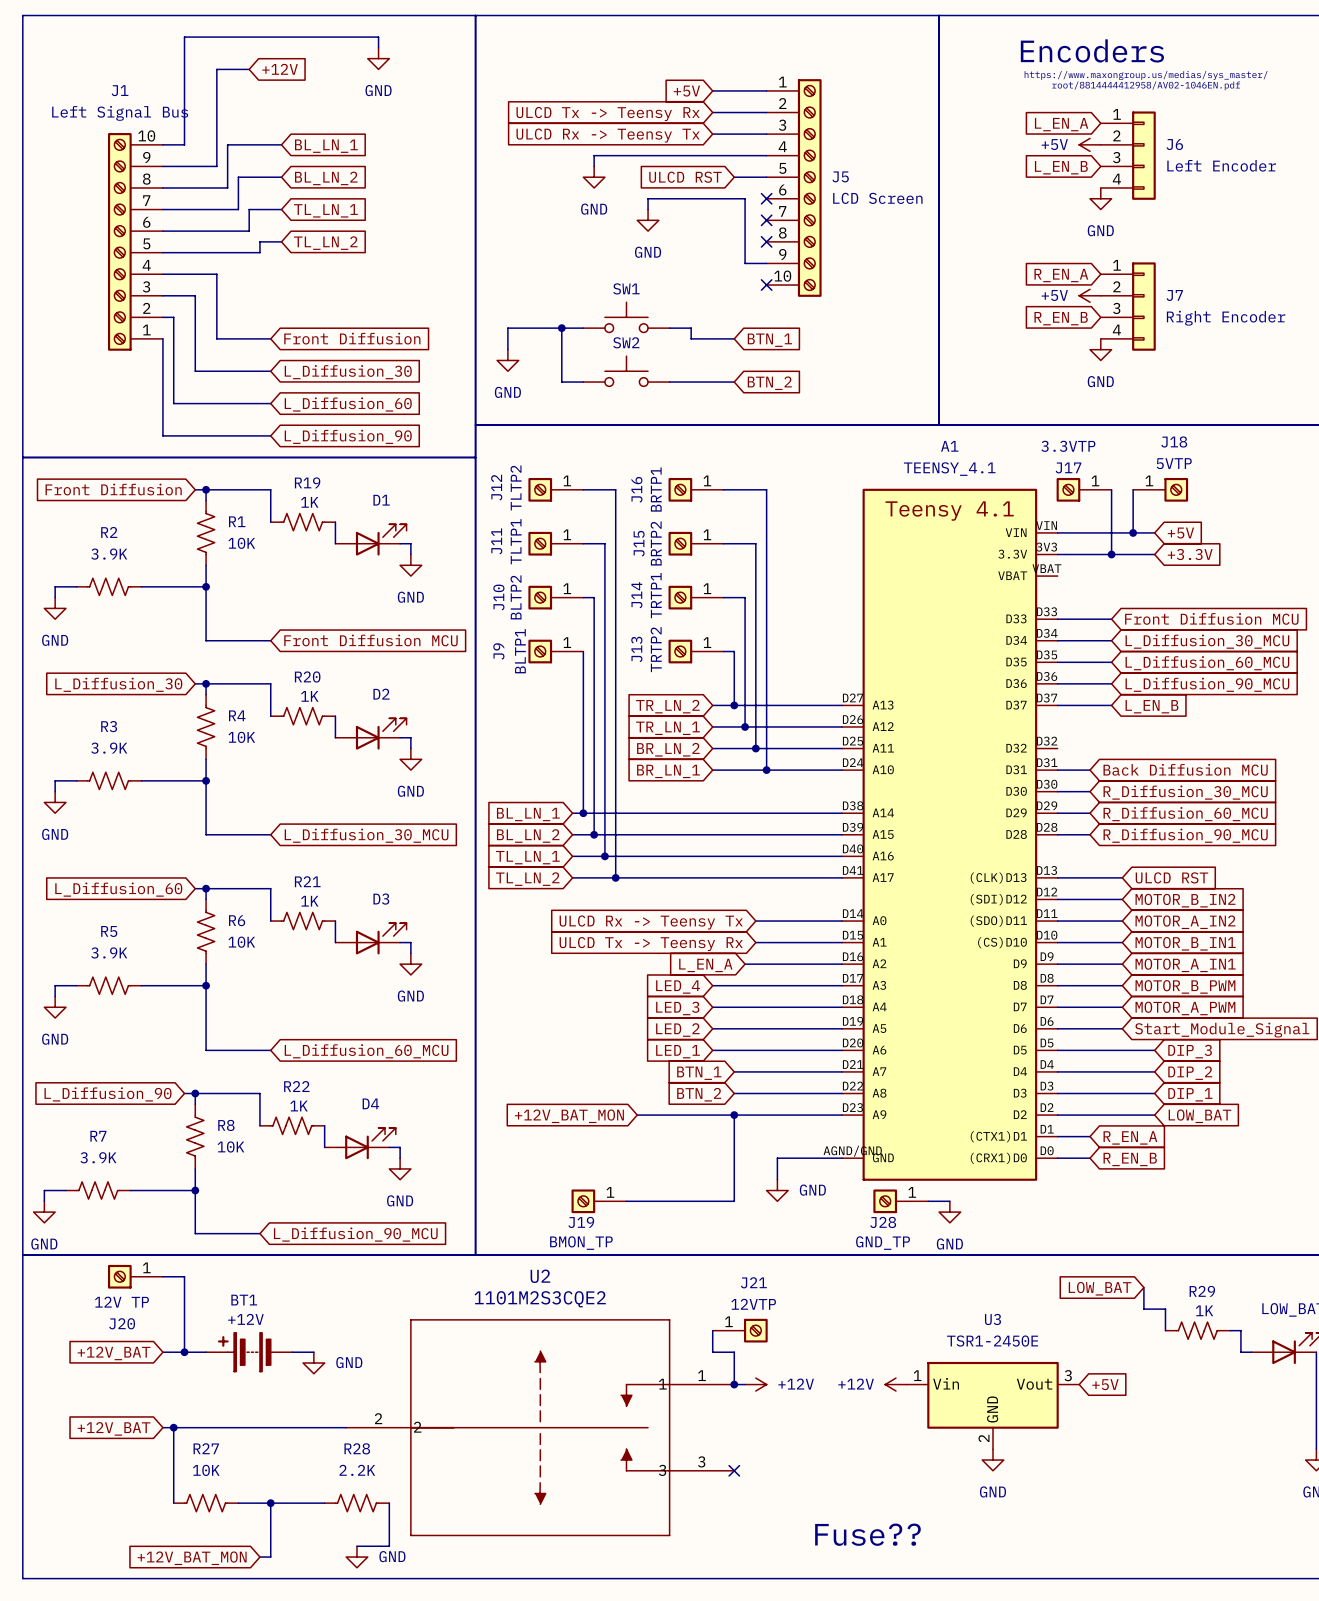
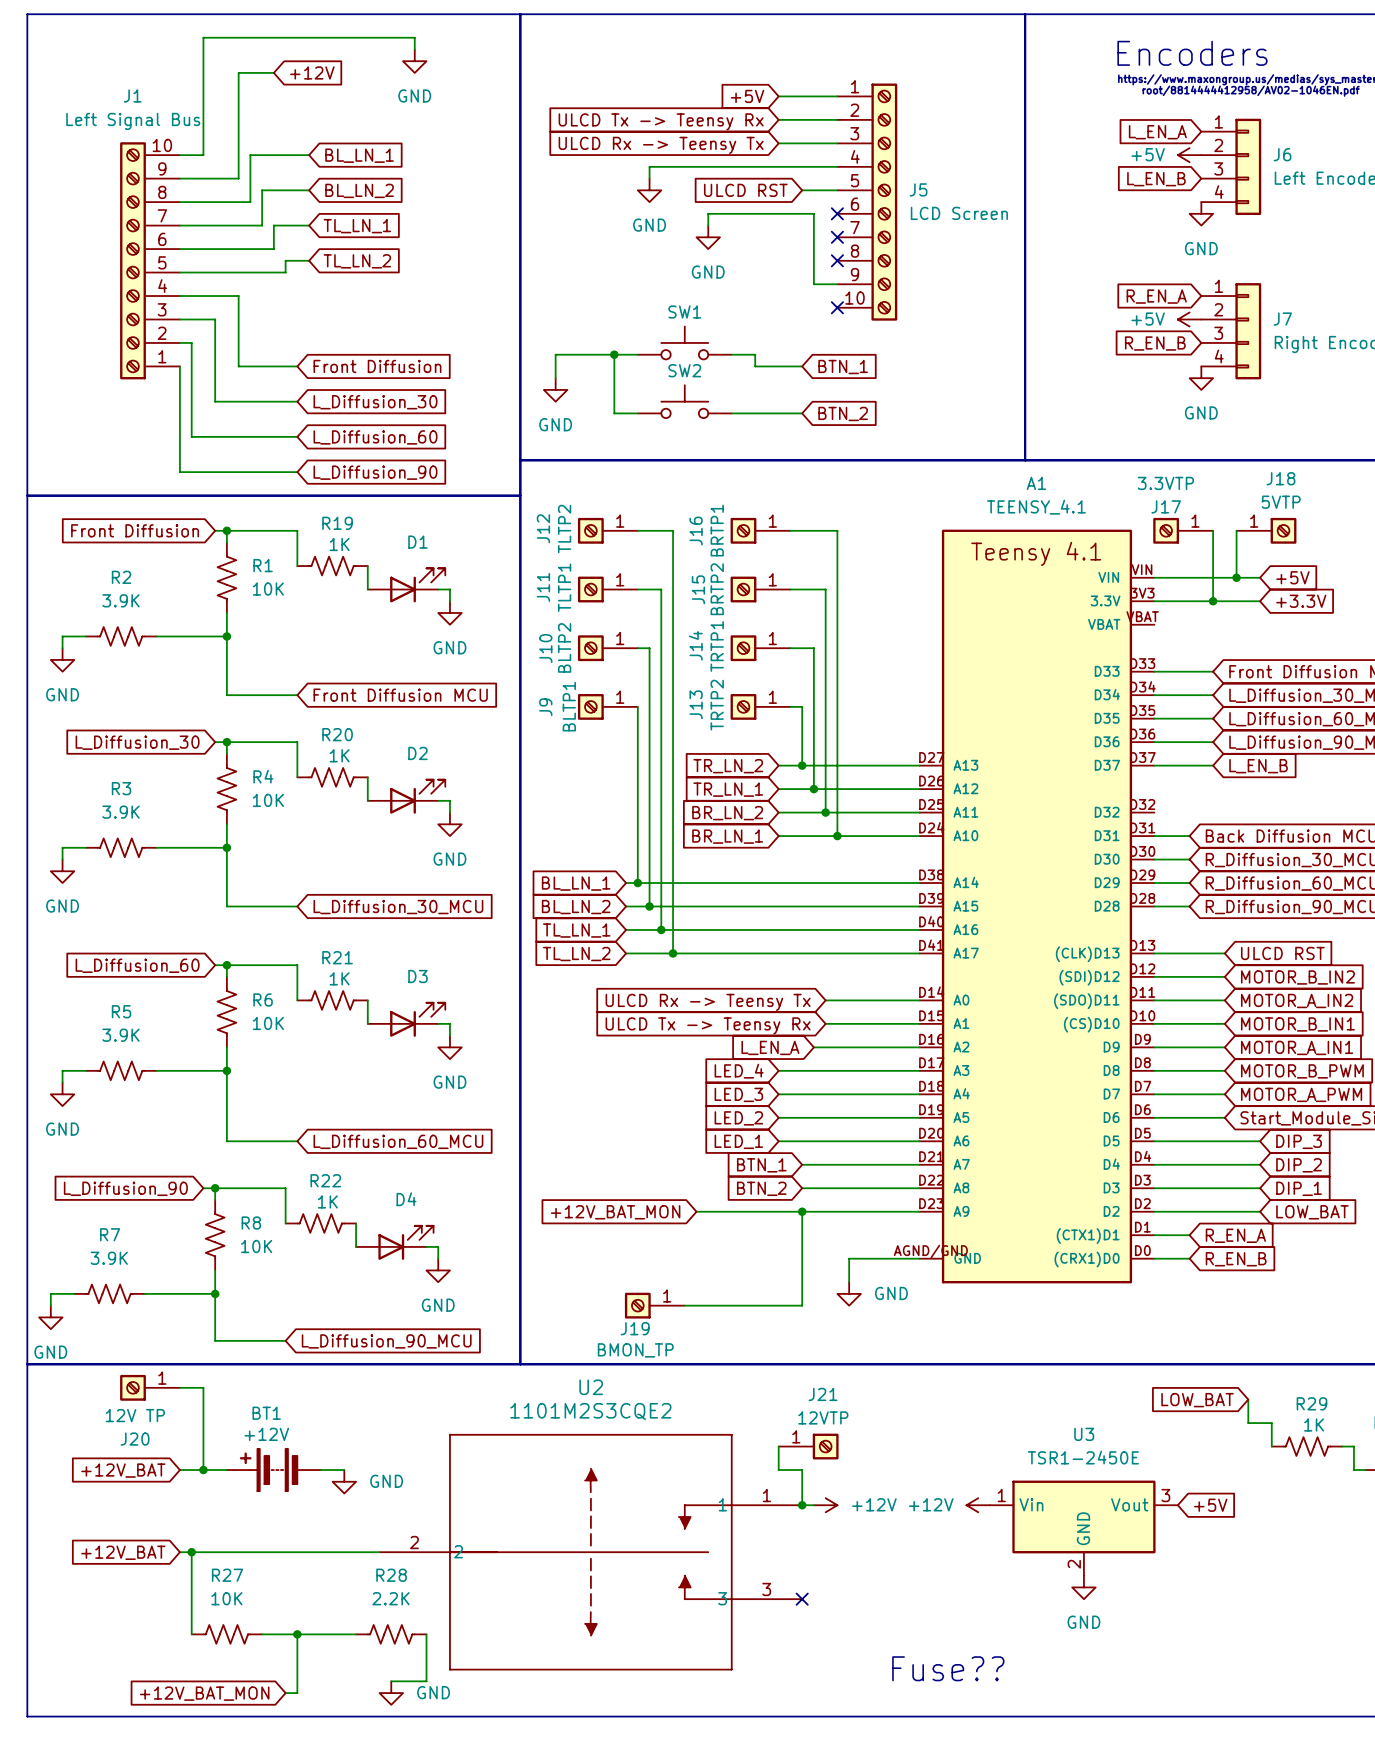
J28: GND_TP (900, 1201) -> none
wire: (928, 1201) (949, 1201) -> none
power symbol: GND (949, 1212) -> none

